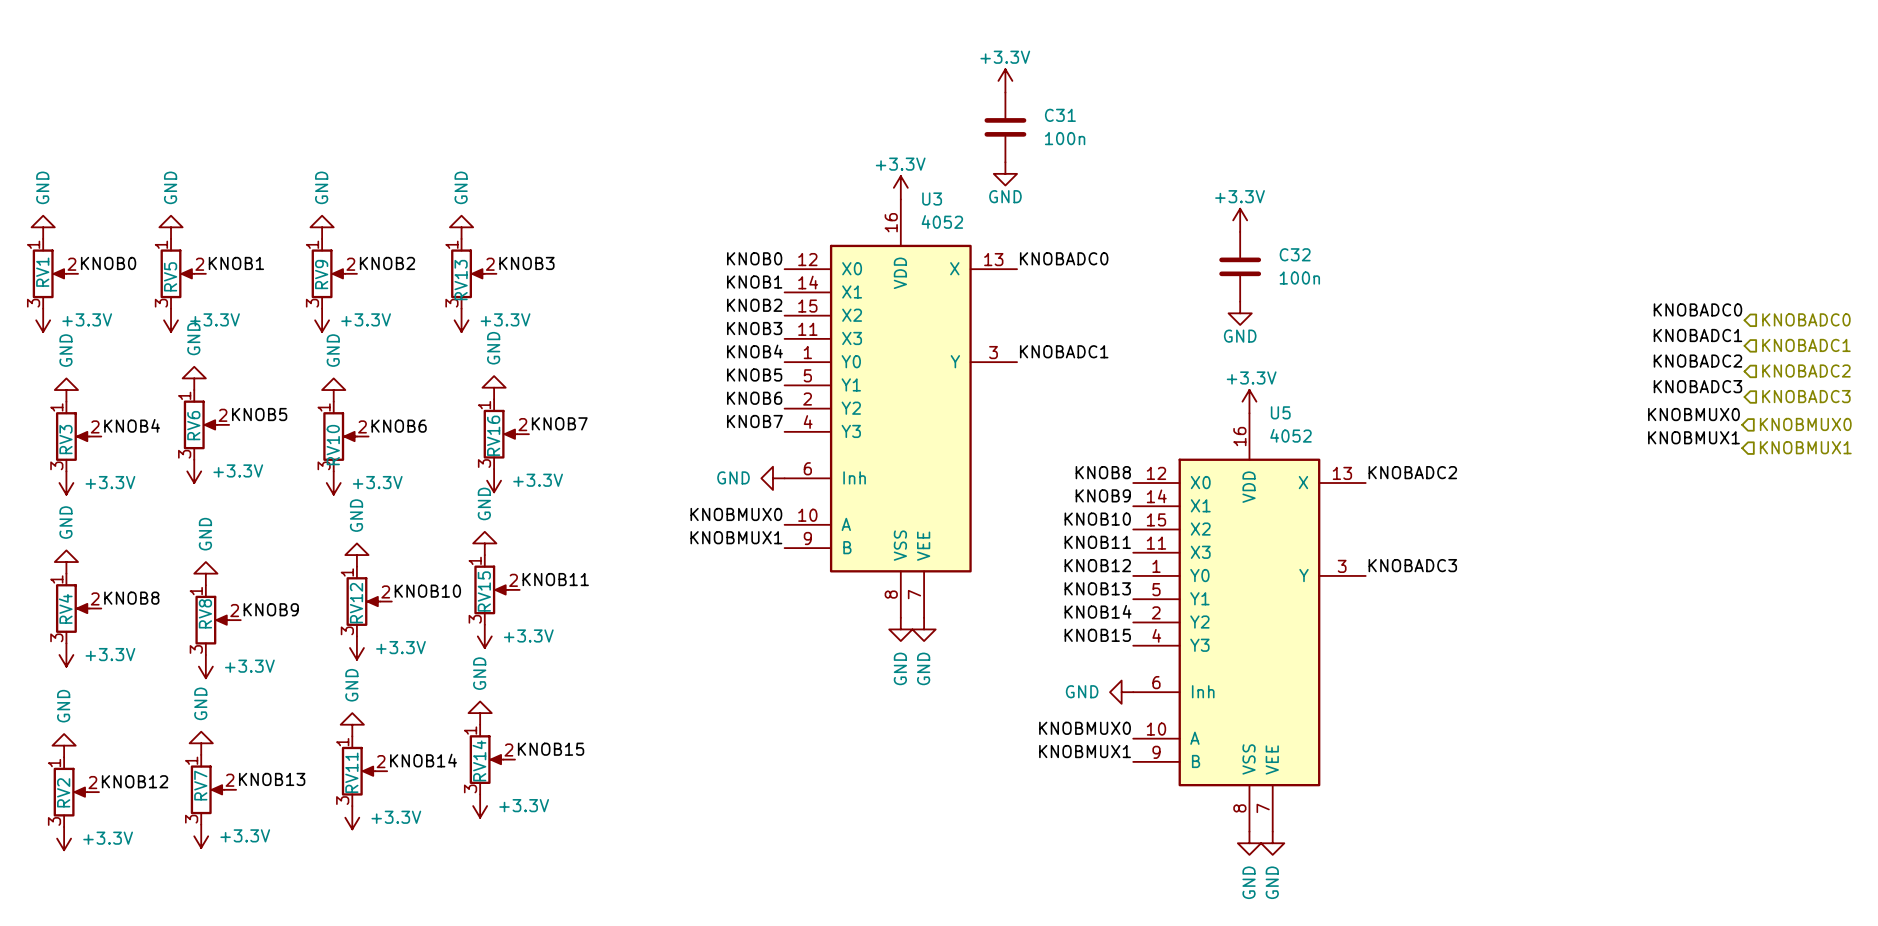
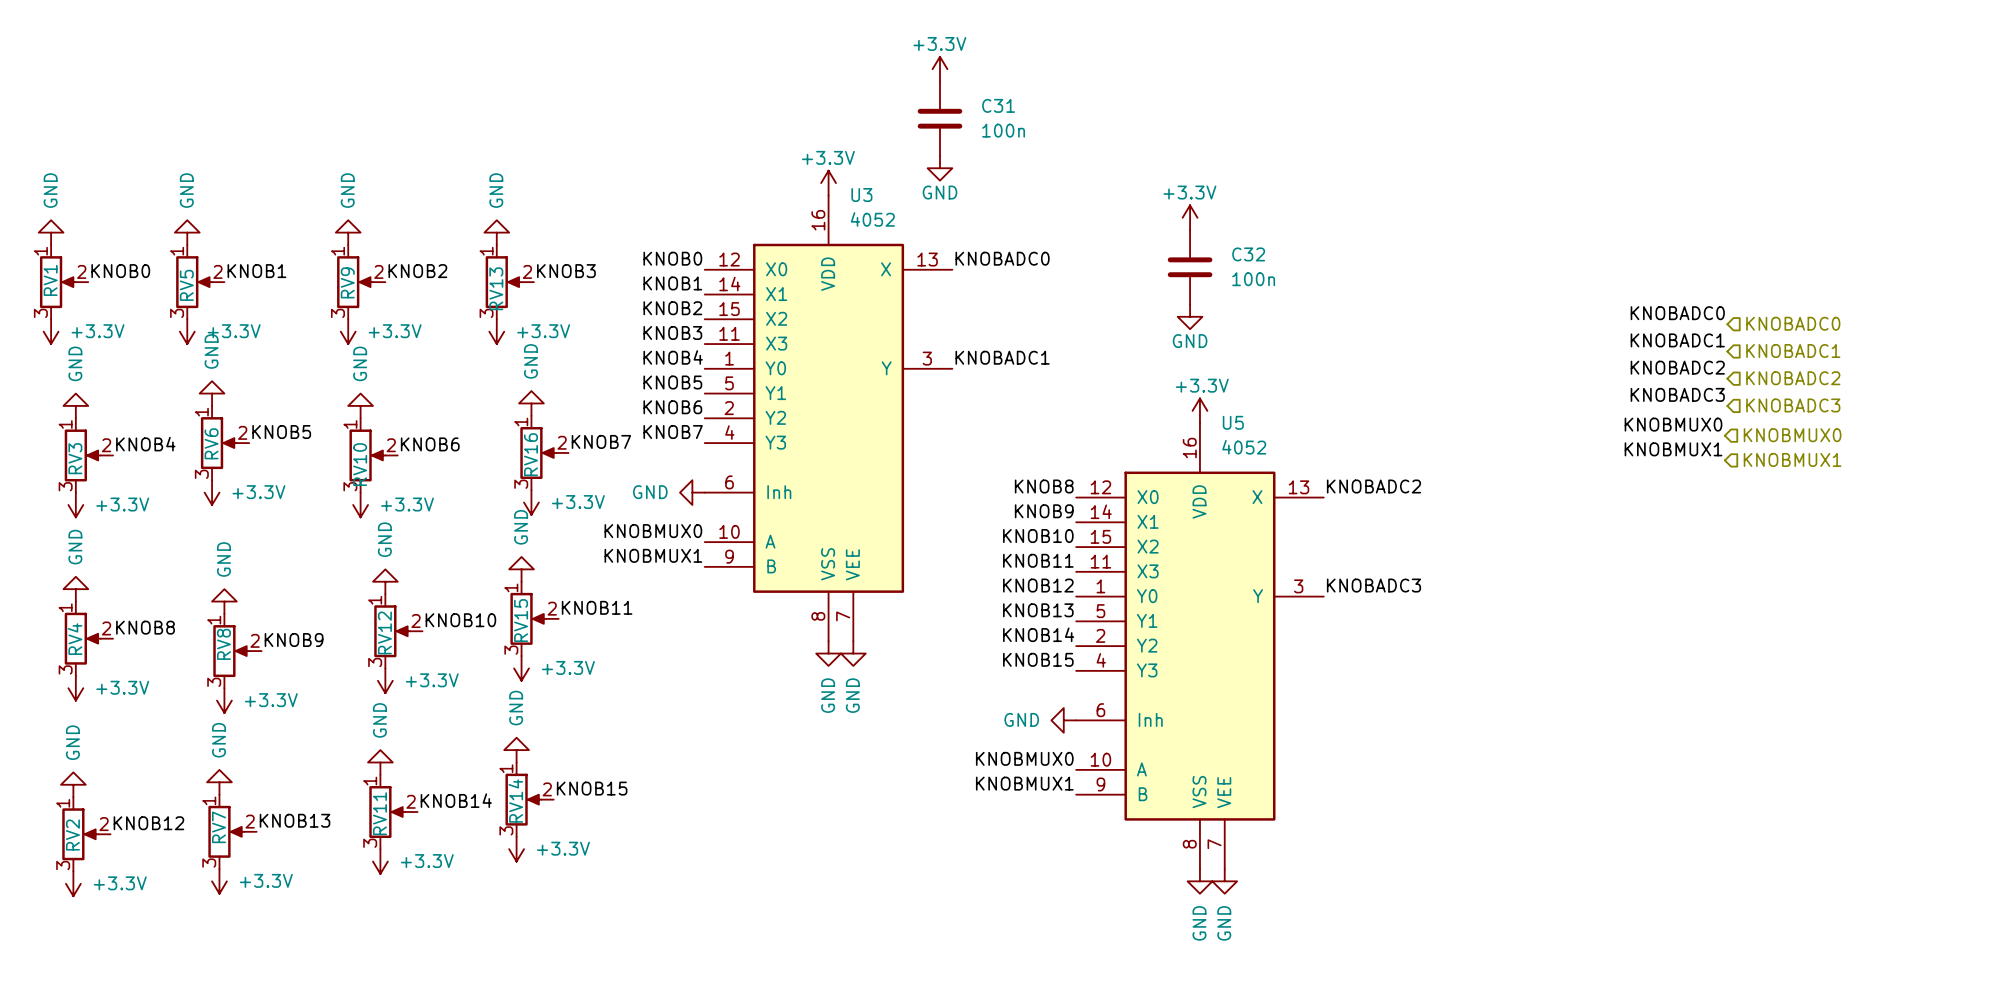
power symbol: none -> +3.3V (939, 69)
power symbol: +3.3V (1005, 80) -> none
C31 position: (1005, 127) -> (939, 118)
power symbol: none -> GND (939, 168)
power symbol: GND (1005, 173) -> none
power symbol: none -> +3.3V (828, 183)
power symbol: +3.3V (900, 187) -> none
power symbol: none -> +3.3V (1190, 217)
power symbol: +3.3V (1240, 220) -> none
label position: KNOB0 (754, 258) -> KNOB0 (672, 258)
label position: KNOBADC0 (1064, 258) -> KNOBADC0 (1002, 258)
C32 position: (1240, 266) -> (1190, 267)
label position: KNOB1 (754, 282) -> KNOB1 (672, 283)
label position: KNOB2 (754, 305) -> KNOB2 (672, 308)
power symbol: none -> GND (1190, 316)
label position: KNOBADC0 (1697, 309) -> KNOBADC0 (1677, 313)
power symbol: GND (1240, 313) -> none
hierarchical label position: KNOBADC0 (1806, 319) -> KNOBADC0 (1793, 323)
label position: KNOB3 (754, 328) -> KNOB3 (672, 332)
label position: KNOBADC1 (1697, 335) -> KNOBADC1 (1677, 340)
hierarchical label position: KNOBADC1 (1806, 345) -> KNOBADC1 (1793, 351)
label position: KNOB4 (754, 351) -> KNOB4 (673, 357)
label position: KNOBADC1 (1064, 351) -> KNOBADC1 (1002, 357)
label position: KNOBADC2 (1697, 361) -> KNOBADC2 (1677, 367)
hierarchical label position: KNOBADC2 (1806, 371) -> KNOBADC2 (1793, 378)
label position: KNOB5 (754, 375) -> KNOB5 (672, 382)
label position: KNOBADC3 (1697, 386) -> KNOBADC3 (1677, 394)
power symbol: none -> +3.3V (1199, 410)
hierarchical label position: KNOBADC3 (1806, 396) -> KNOBADC3 (1793, 405)
label position: KNOB6 (754, 398) -> KNOB6 (672, 407)
power symbol: +3.3V (1249, 401) -> none
U3 position: (900, 408) -> (828, 418)
label position: KNOBMUX0 (1693, 414) -> KNOBMUX0 (1673, 424)
label position: KNOB7 (754, 421) -> KNOB7 (673, 432)
hierarchical label position: KNOBMUX0 (1805, 424) -> KNOBMUX0 (1792, 435)
label position: KNOBMUX1 (1693, 437) -> KNOBMUX1 (1673, 449)
hierarchical label position: KNOBMUX1 (1805, 447) -> KNOBMUX1 (1792, 459)
power symbol: none -> GND (692, 492)
label position: KNOB8 (1103, 472) -> KNOB8 (1044, 486)
label position: KNOBADC2 (1412, 472) -> KNOBADC2 (1373, 486)
power symbol: GND (772, 478) -> none
label position: KNOB9 (1103, 495) -> KNOB9 (1044, 511)
label position: KNOBMUX0 (736, 514) -> KNOBMUX0 (653, 531)
label position: KNOB10 (1097, 519) -> KNOB10 (1038, 536)
label position: KNOBMUX1 (736, 537) -> KNOBMUX1 (653, 555)
label position: KNOB11 (1097, 542) -> KNOB11 (1038, 560)
label position: KNOB12 (1097, 565) -> KNOB12 (1038, 585)
label position: KNOBADC3 (1412, 565) -> KNOBADC3 (1373, 585)
label position: KNOB13 (1097, 588) -> KNOB13 (1038, 610)
label position: KNOB14 (1098, 611) -> KNOB14 (1038, 634)
power symbol: none -> GND (828, 653)
power symbol: none -> GND (853, 653)
U5 position: (1249, 622) -> (1199, 646)
power symbol: GND (900, 629) -> none
power symbol: GND (924, 629) -> none
label position: KNOB15 (1097, 635) -> KNOB15 (1038, 659)
power symbol: none -> GND (1063, 720)
power symbol: GND (1121, 692) -> none
label position: KNOBMUX0 (1085, 728) -> KNOBMUX0 (1024, 758)
label position: KNOBMUX1 (1085, 751) -> KNOBMUX1 (1024, 783)
power symbol: none -> GND (1199, 881)
power symbol: none -> GND (1224, 881)
power symbol: GND (1249, 843) -> none
power symbol: GND (1272, 843) -> none

